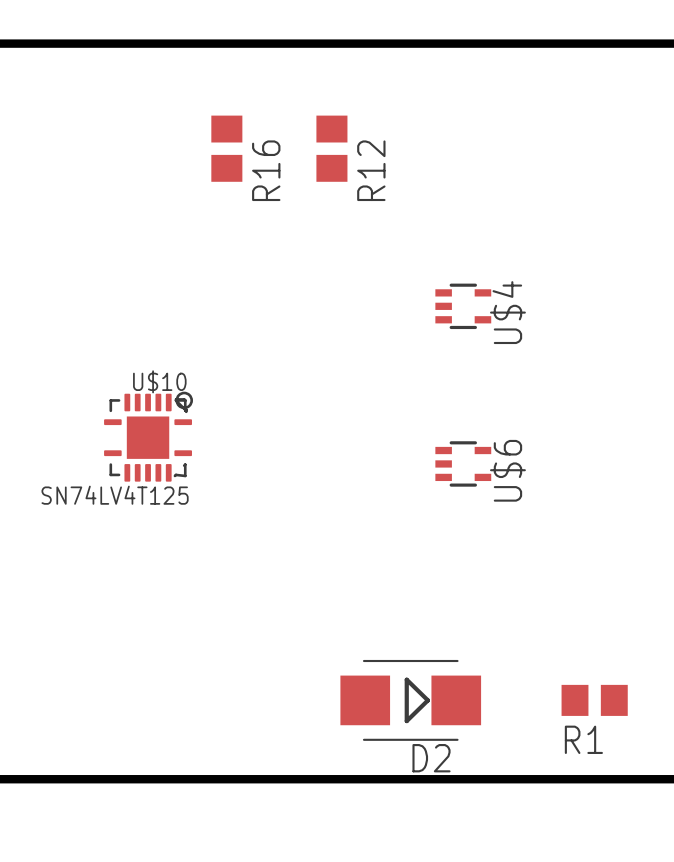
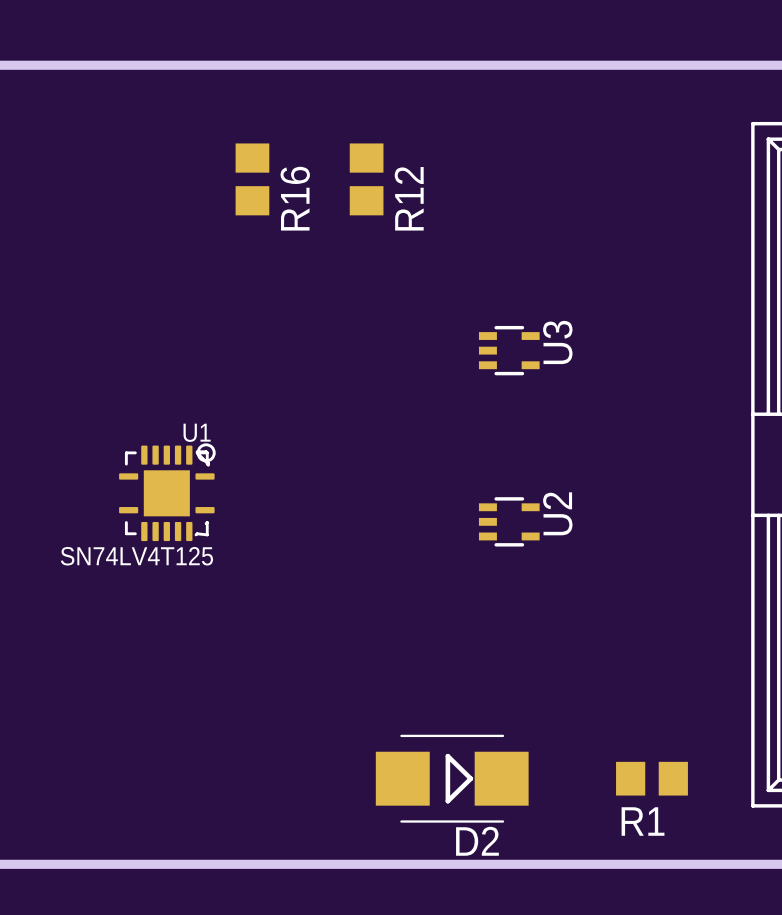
U$4 name: U$4 (507, 312) -> U3 (557, 342)
U$10 name: U$10 (159, 381) -> U1 (197, 432)
U$6 name: U$6 (507, 470) -> U2 (557, 513)

